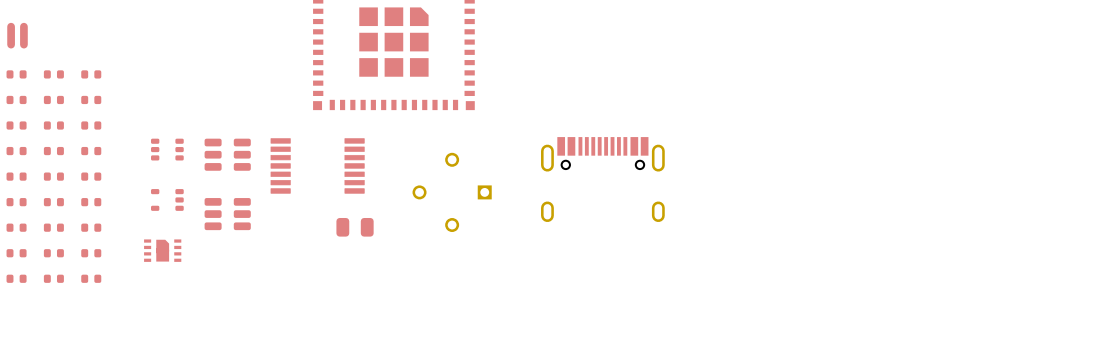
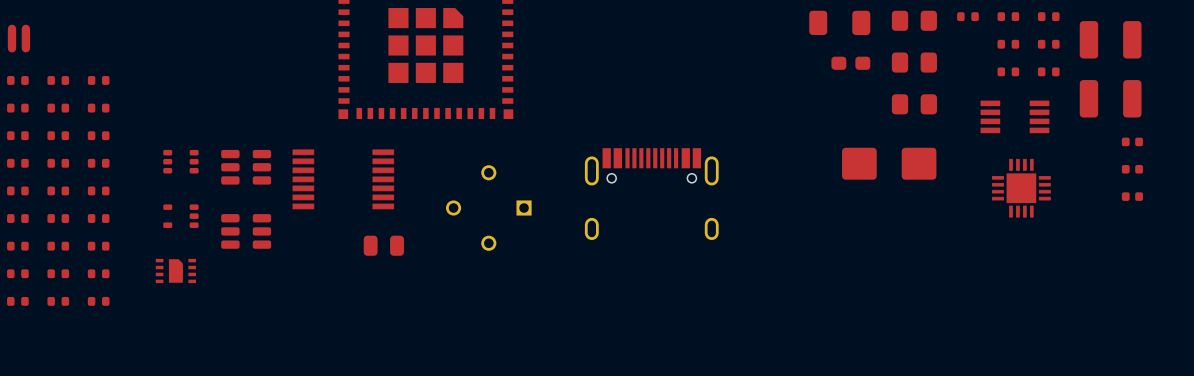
part: none -> (967, 16)
part: none -> (1008, 16)
part: none -> (1048, 16)
part: none -> (914, 20)
part: none -> (839, 22)
part: none -> (1110, 39)
part: none -> (1008, 44)
part: none -> (1048, 44)
part: none -> (914, 62)
part: none -> (850, 63)
part: none -> (1008, 71)
part: none -> (1048, 71)
part: none -> (1110, 98)
part: none -> (914, 104)
part: none -> (1014, 116)
part: none -> (1132, 141)
part: none -> (889, 163)
part: none -> (1132, 169)
part: none -> (1021, 188)
part: none -> (1132, 196)

